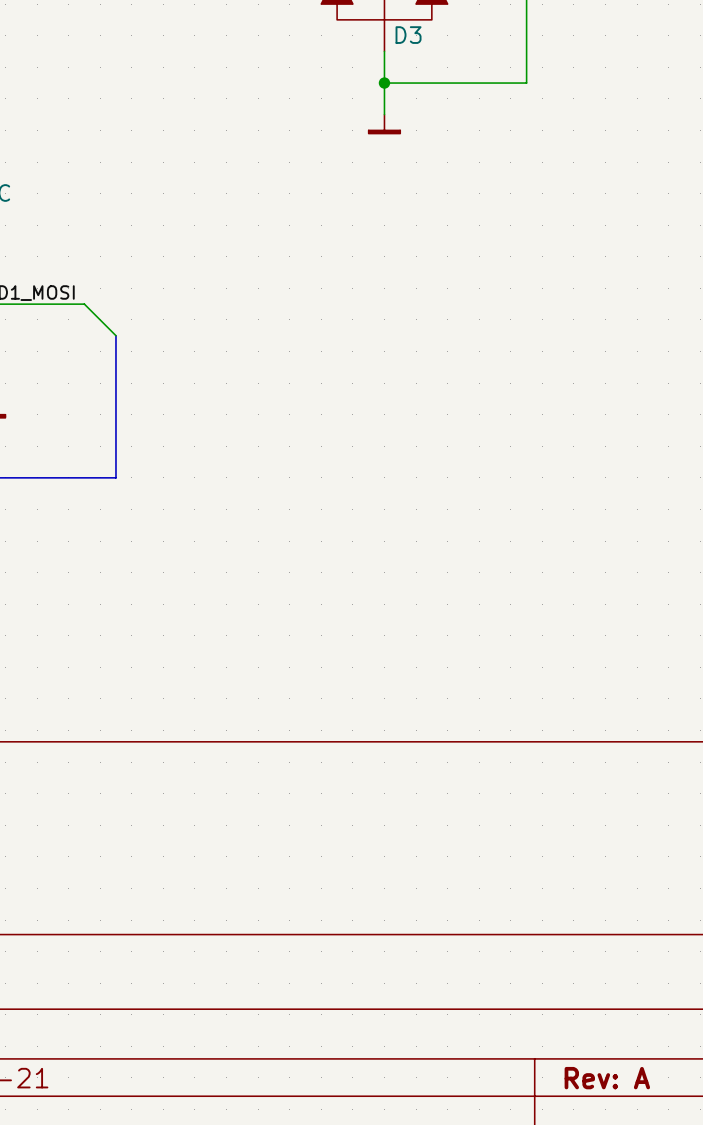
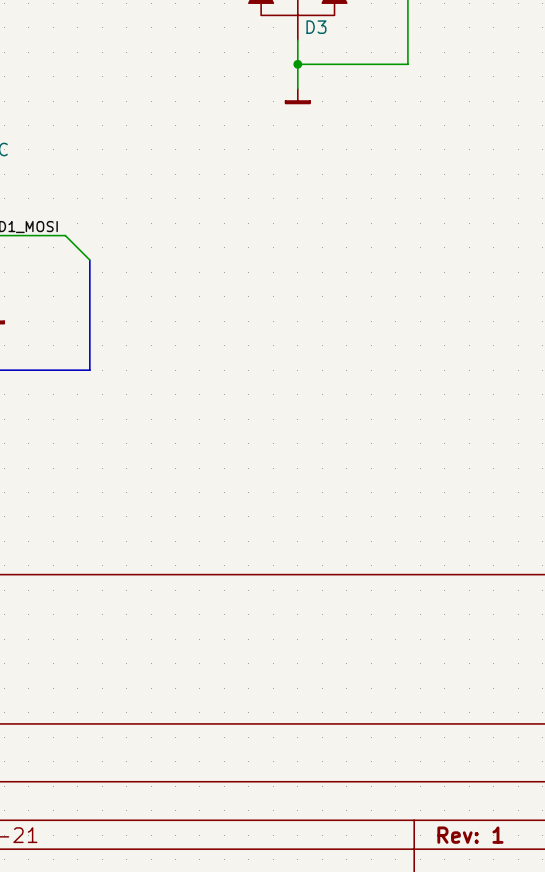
title block: Rev: A (607, 1078) -> Rev: 1 (470, 835)

